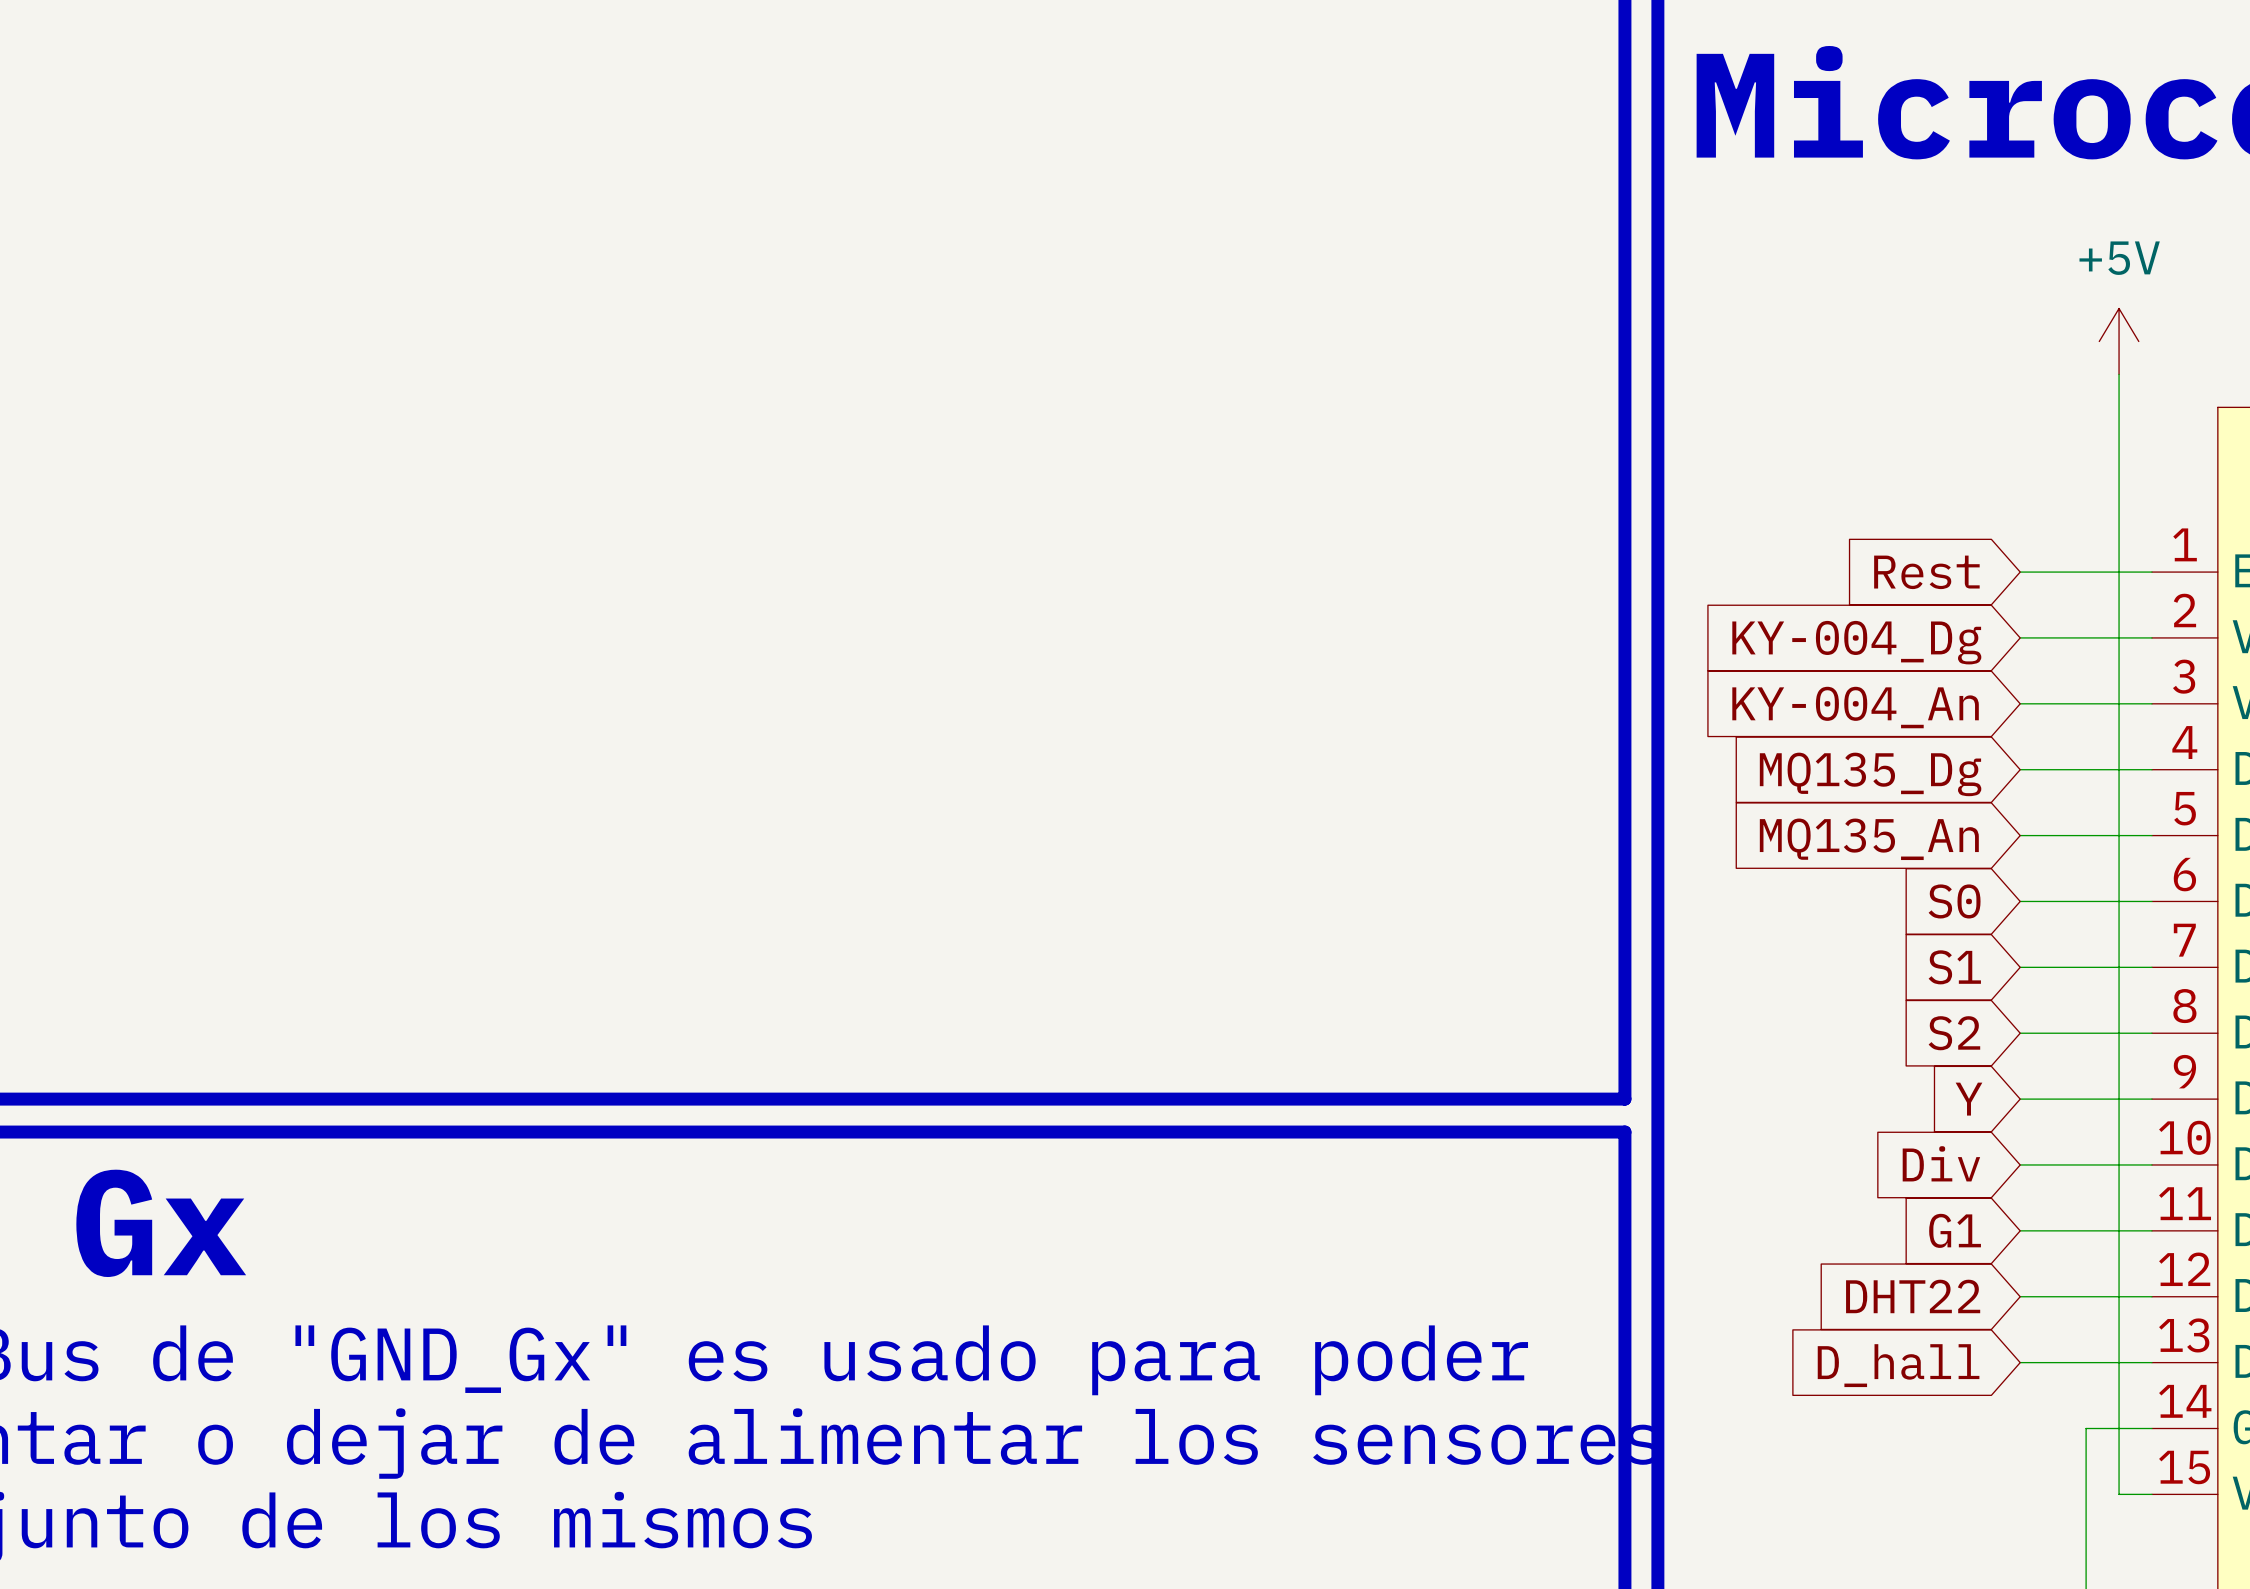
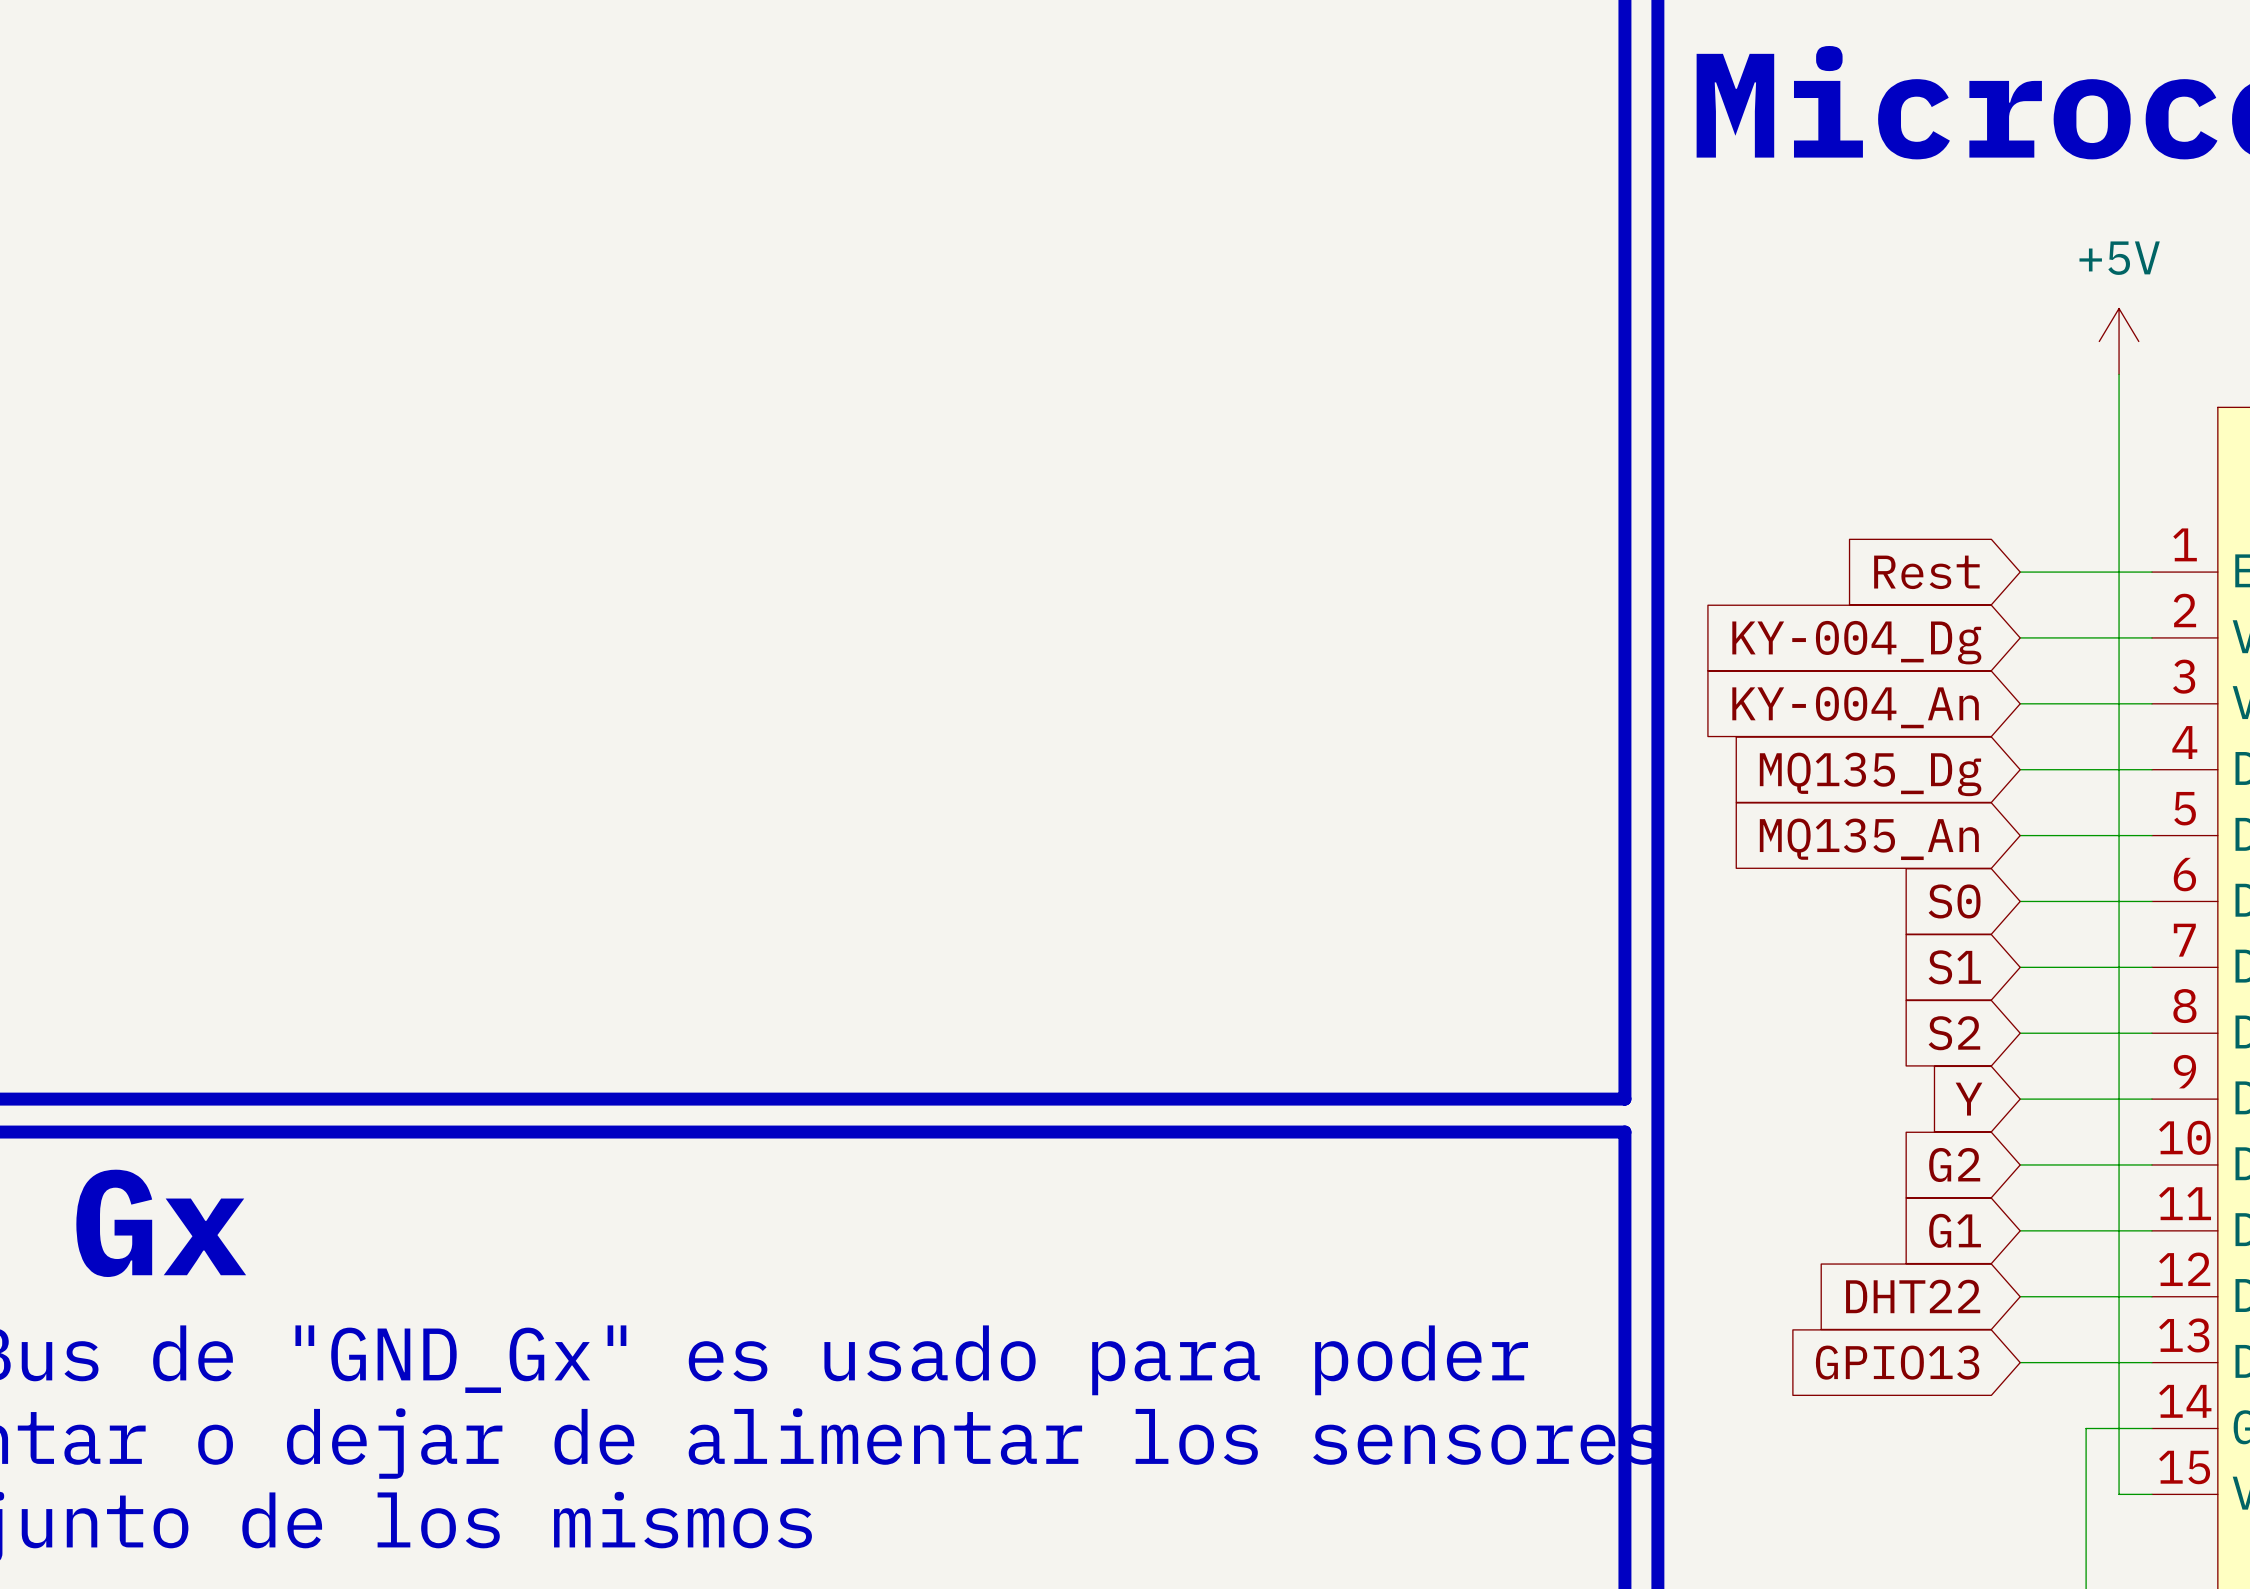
global label: Div (1941, 1163) -> G2 (1954, 1164)
global label: D_hall (1898, 1365) -> GPIO13 (1897, 1362)

